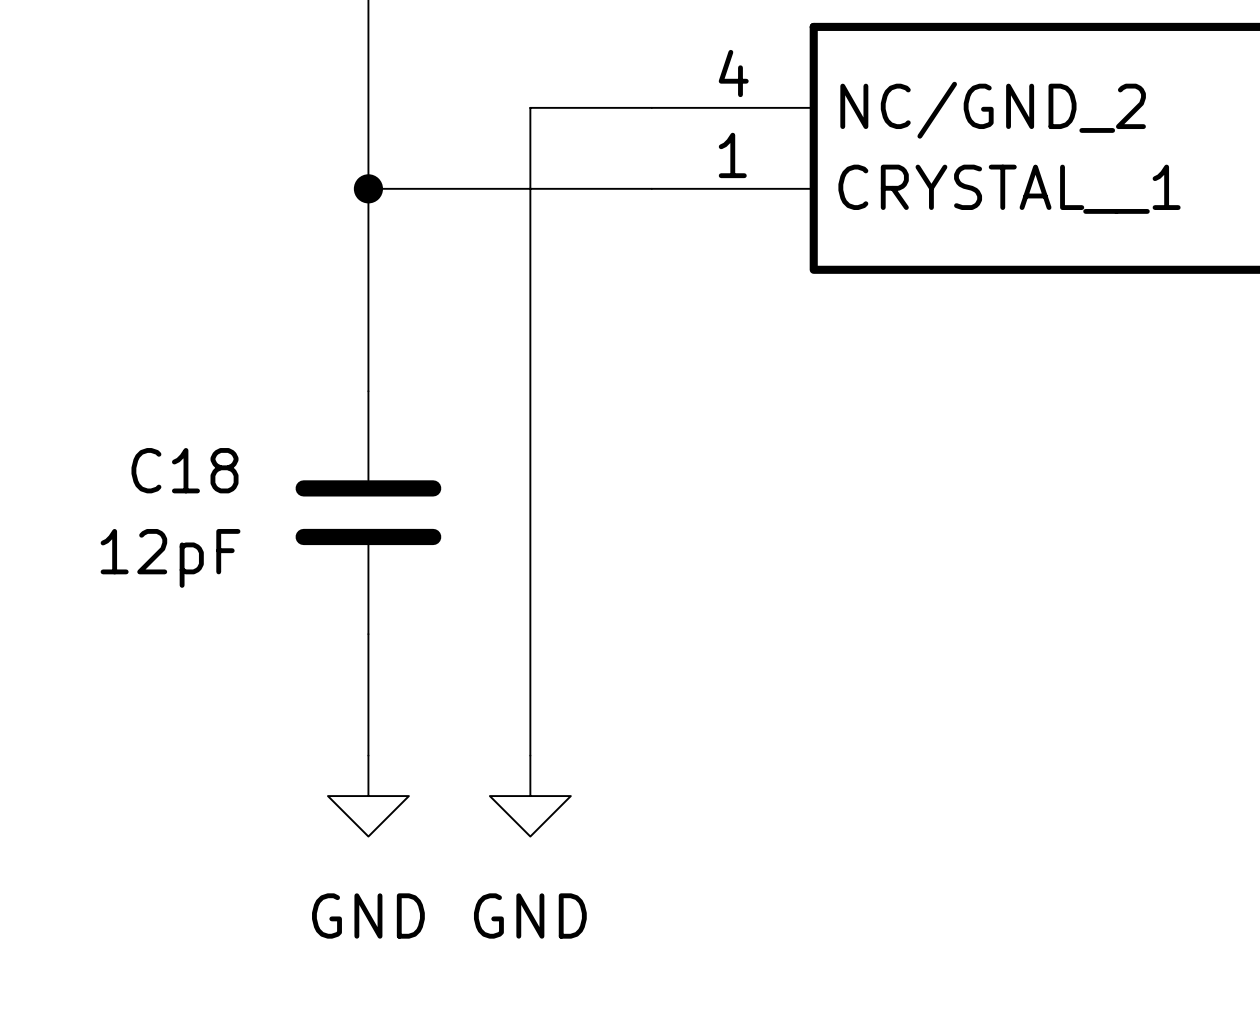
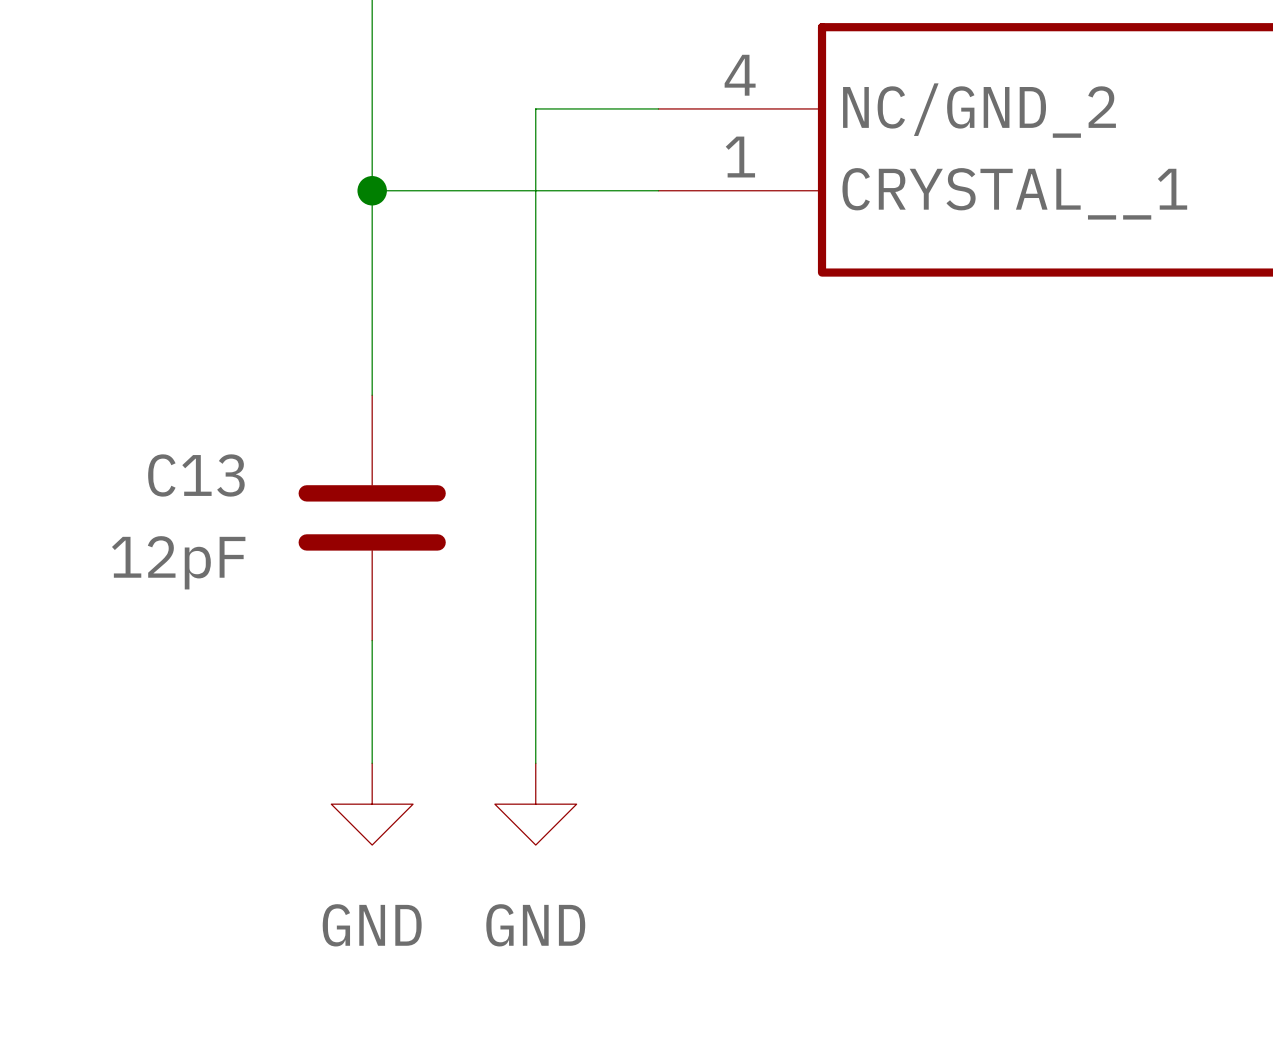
C18 name: C18 (184, 470) -> C13 (196, 475)

